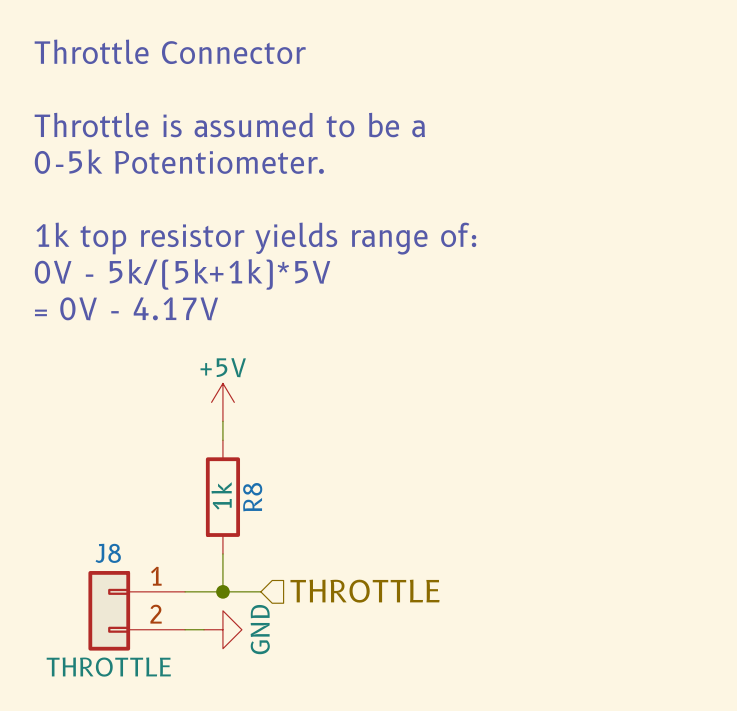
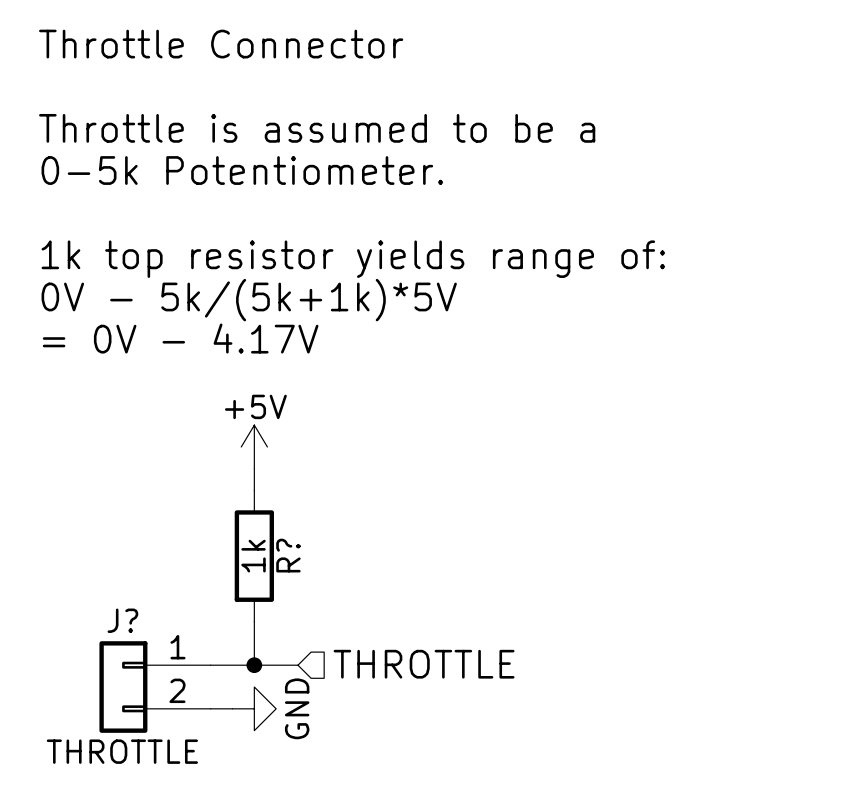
R8 name: R8 (252, 497) -> R? (288, 555)
J8 name: J8 (108, 553) -> J? (122, 620)

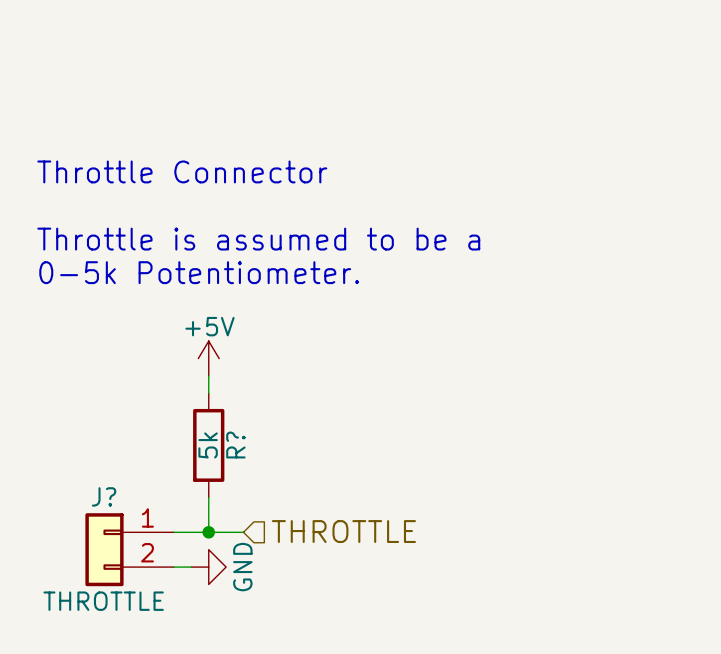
text position: Throttle Connector (221, 44) -> Throttle Connector (182, 171)
text: Throttle is assumed to be a (317, 128) -> none
text: 0-5k Potentiometer. (242, 170) -> none
text: 1k top resistor yields range of: (353, 259) -> none
text: 0V - 5k/(5k+1k)*5V (249, 300) -> Throttle is assumed to be a (258, 239)
text: = 0V - 4.17V (180, 338) -> 0-5k Potentiometer. (199, 272)
R? value: 1k (253, 556) -> 5k (208, 445)

